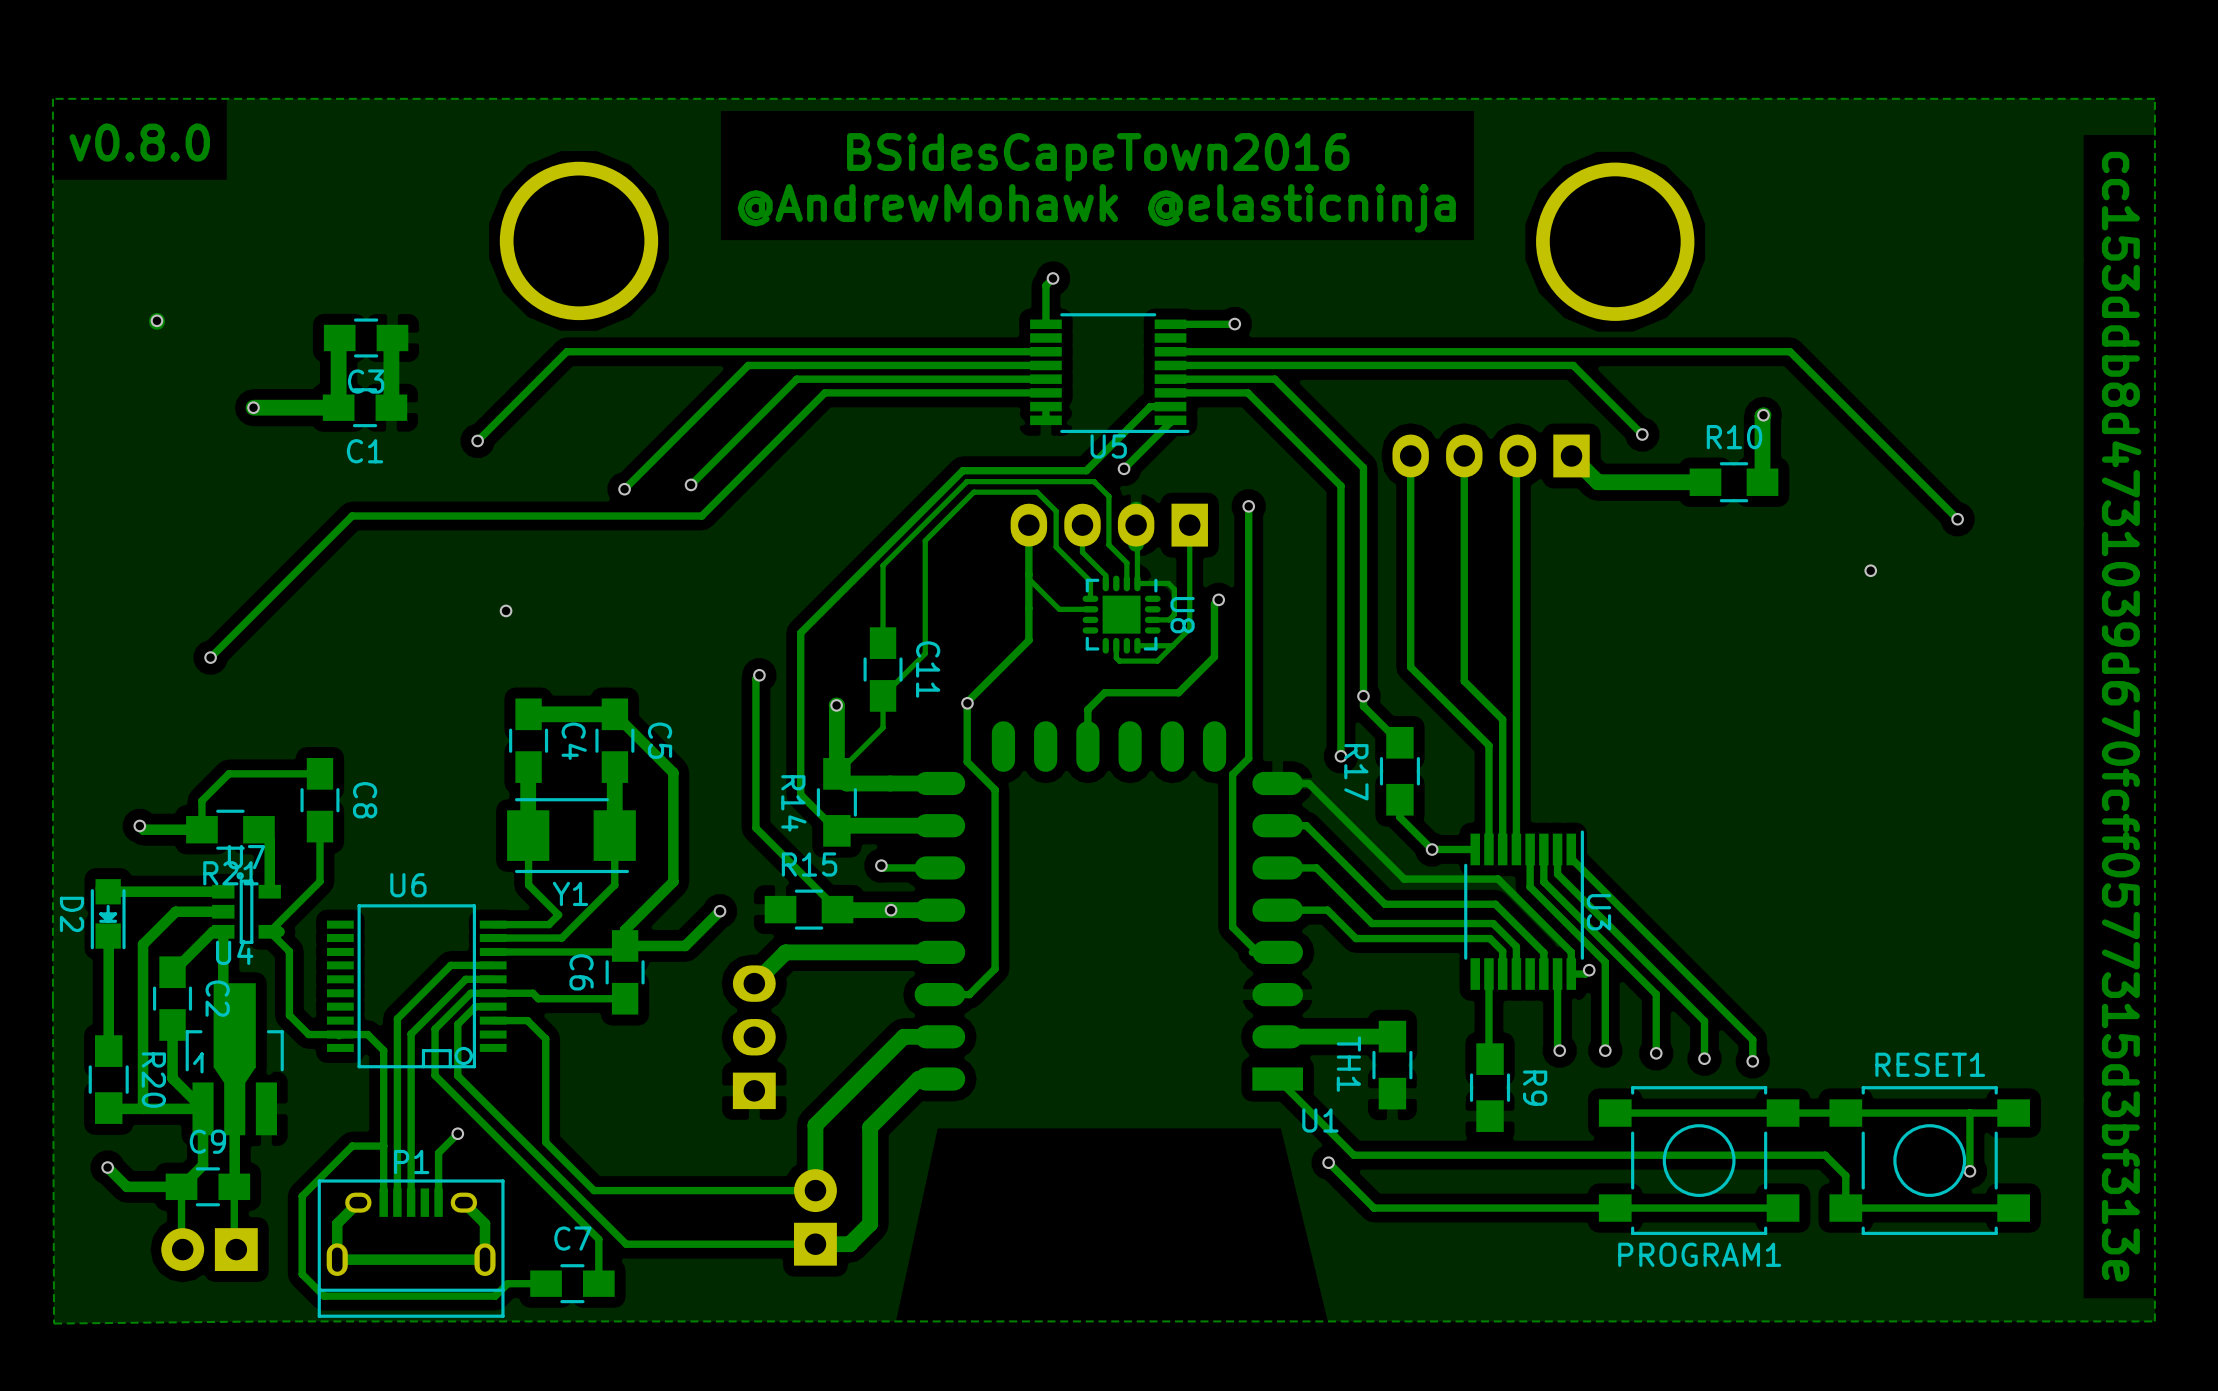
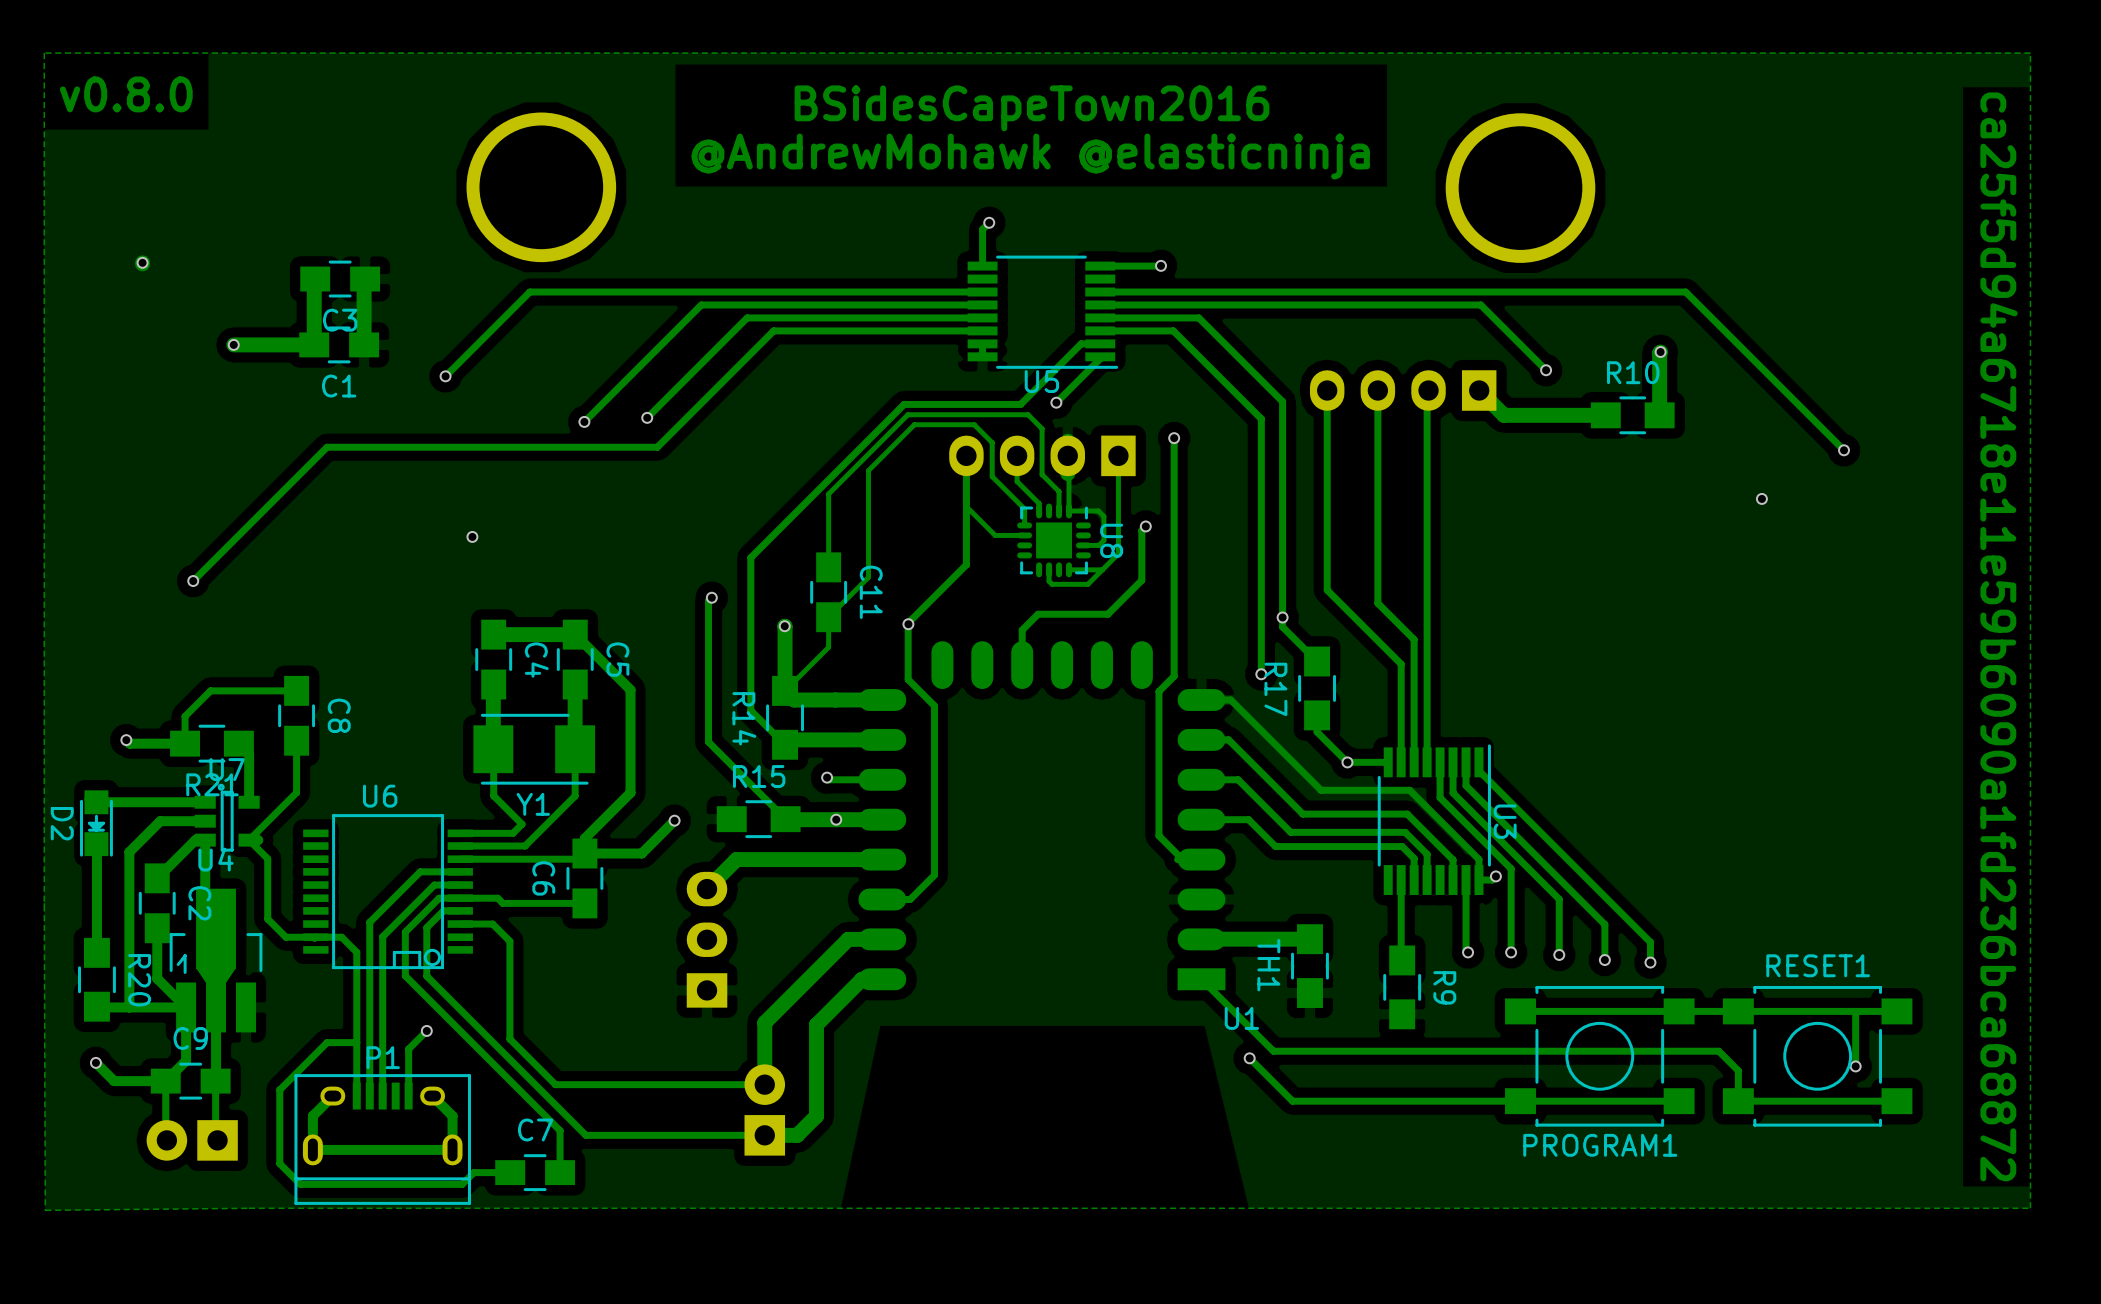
text: cc153ddb8d4731039d670fcff0577315d3bf313e (2121, 716) -> ca25f5d94a6718e11e59b6090a1fd236bca68872 (1999, 636)

